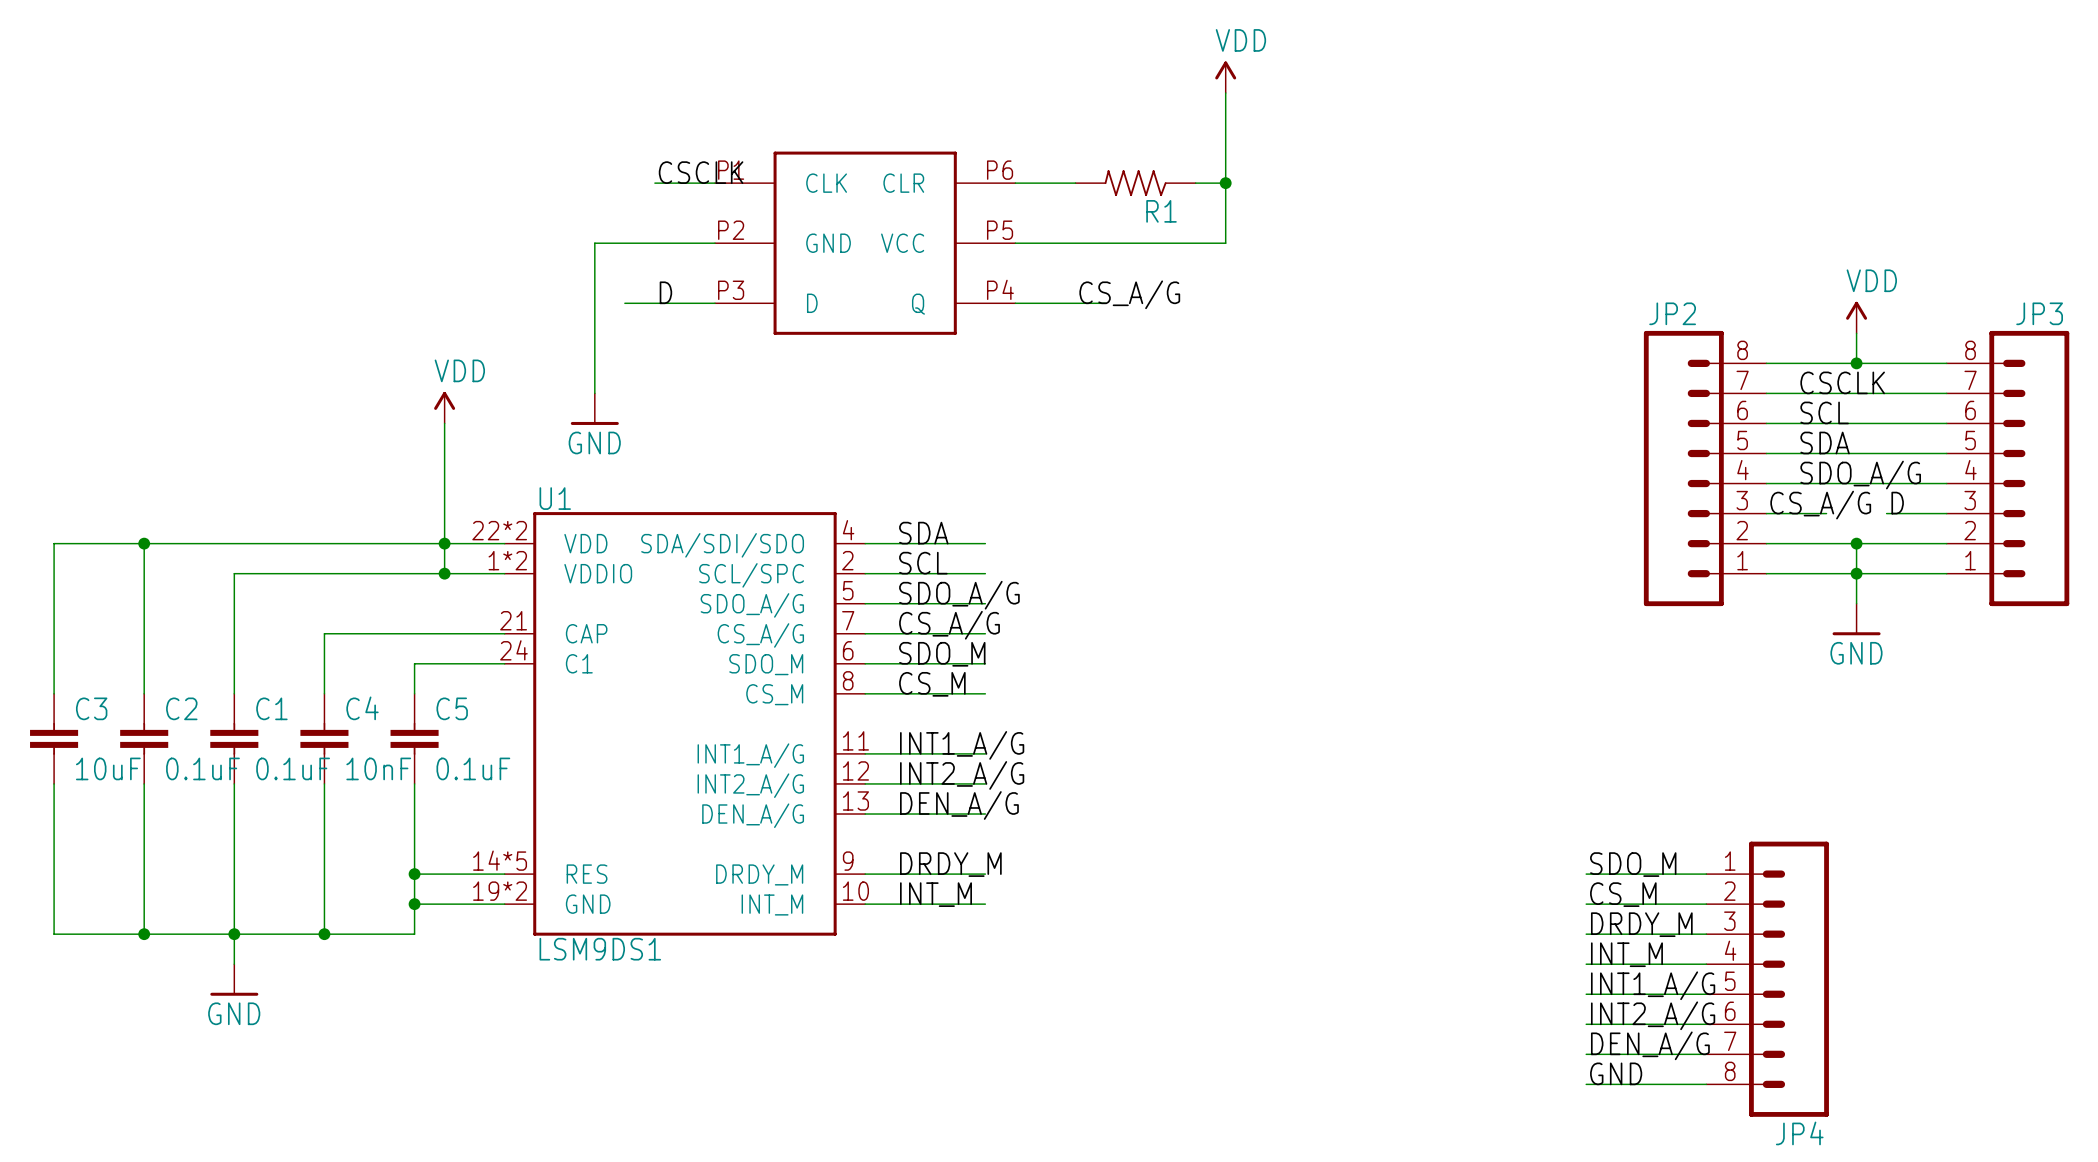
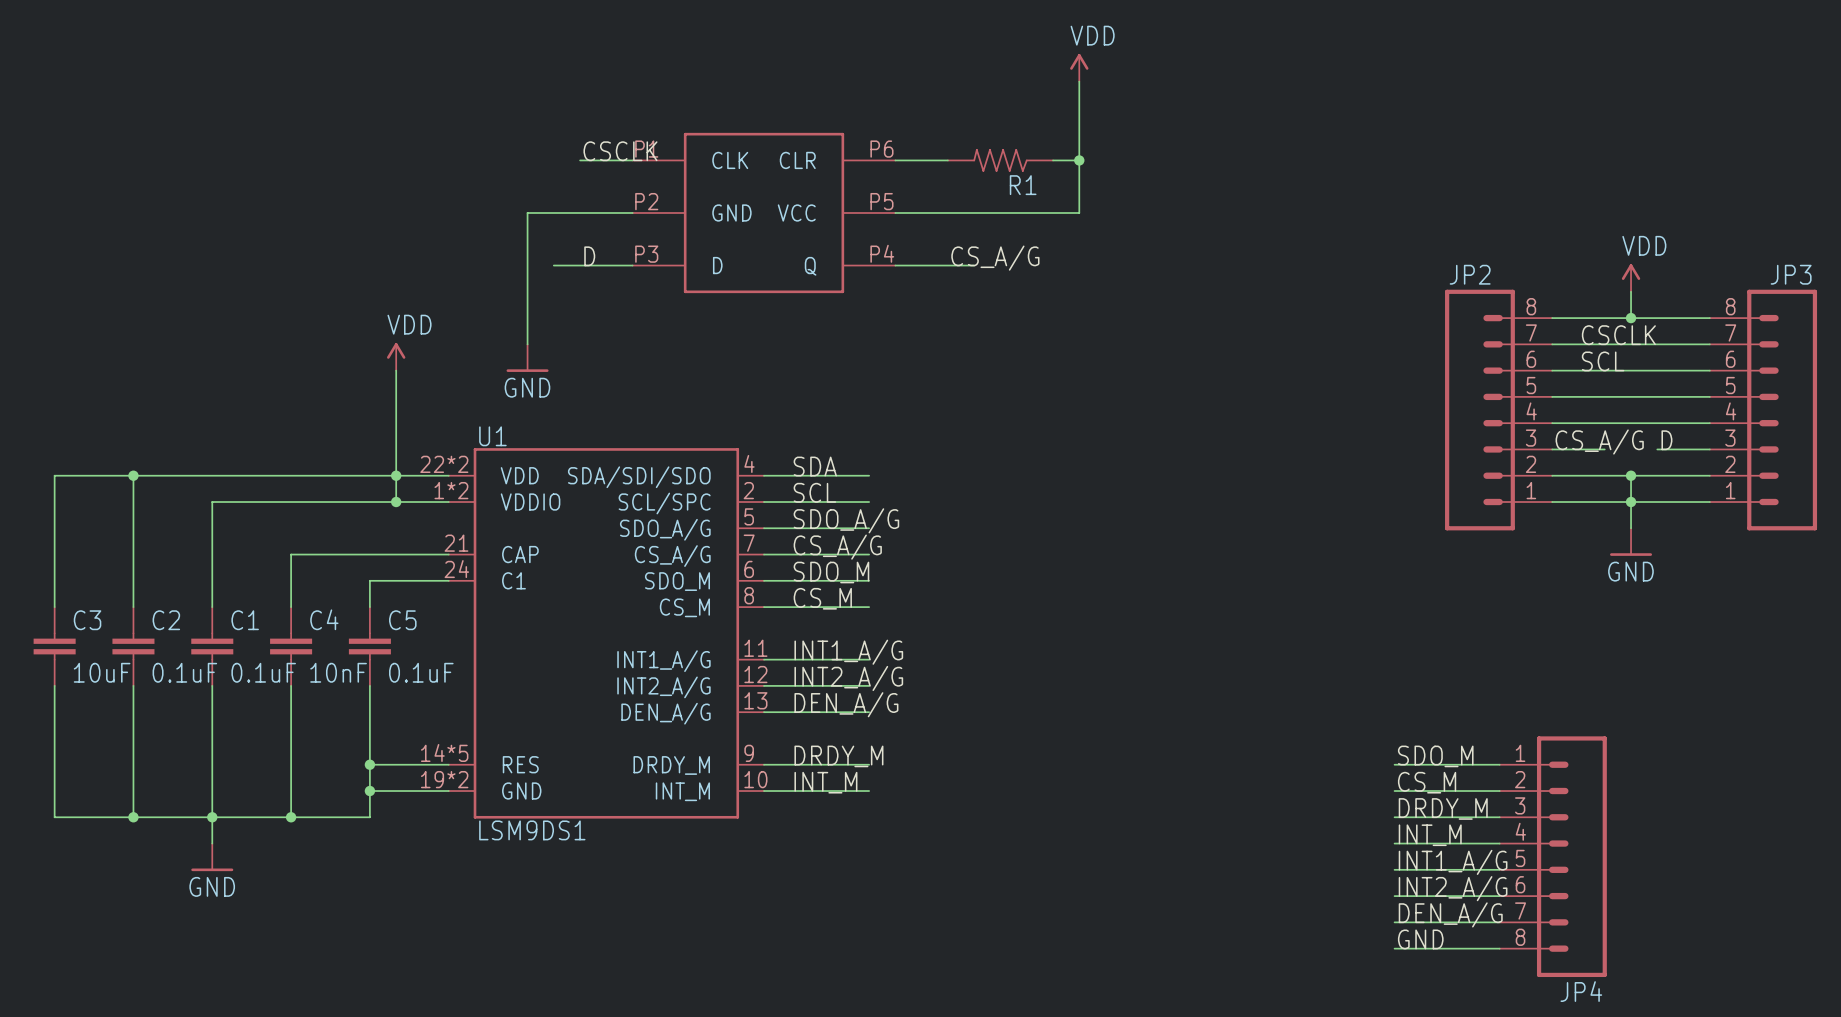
label: SDA (1825, 442) -> none
label: SDO_A/G (1860, 475) -> none

